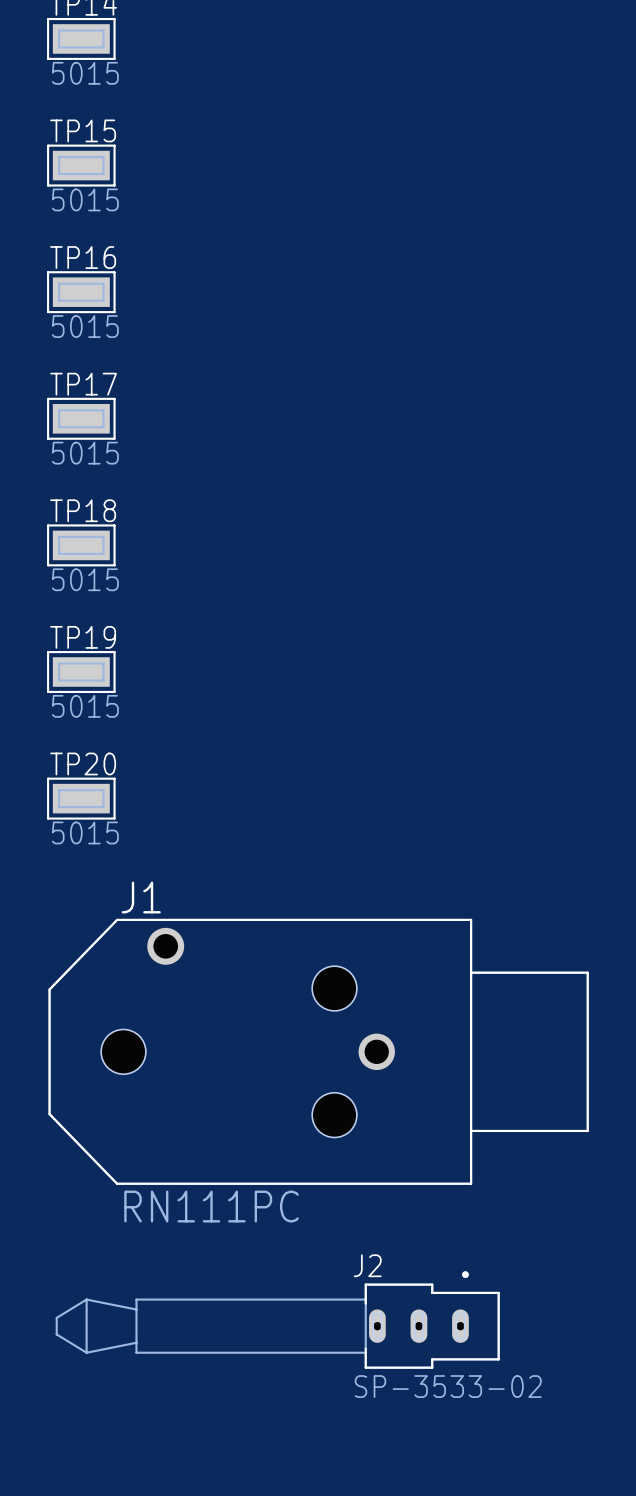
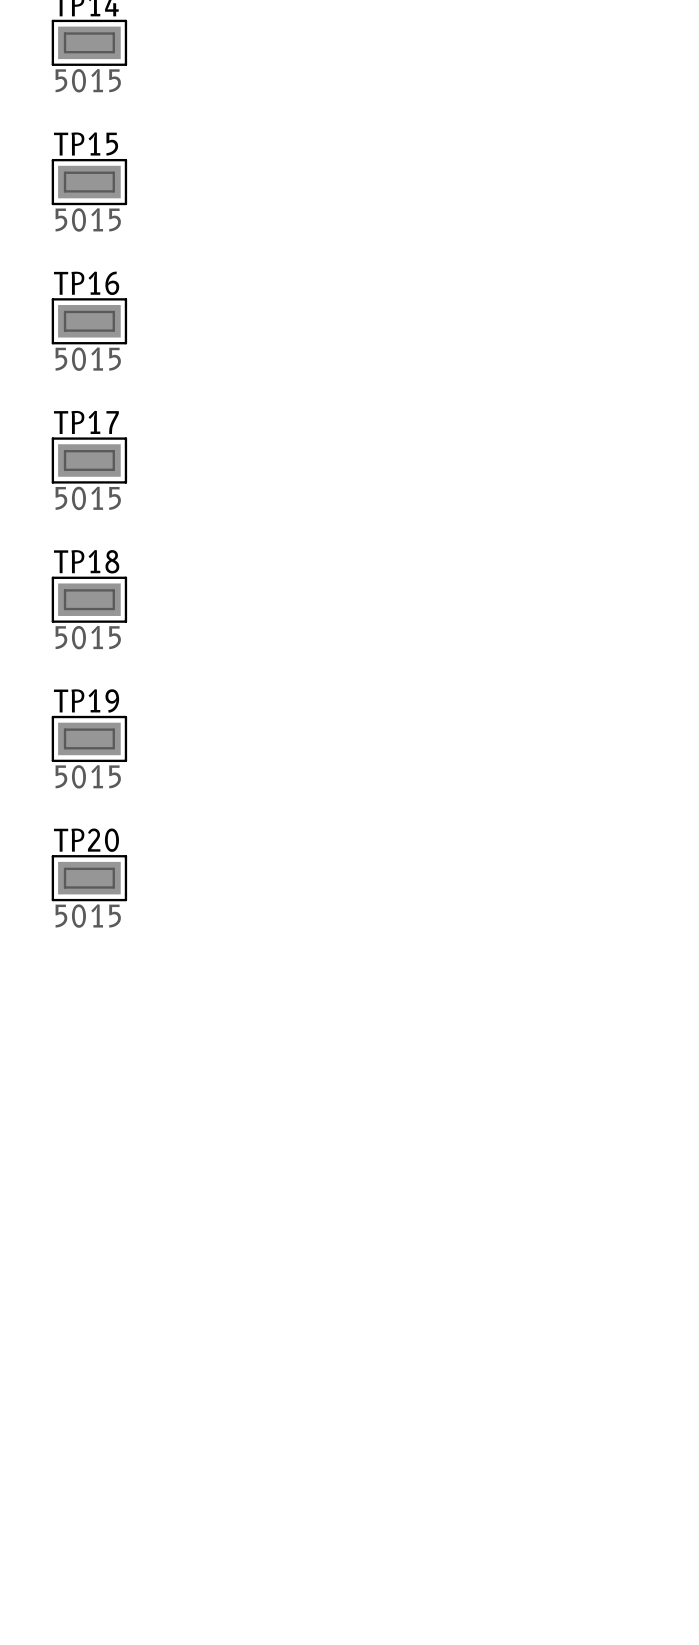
J1: RN111PC (318, 1051) -> none
J2: SP-3533-02 (277, 1320) -> none

